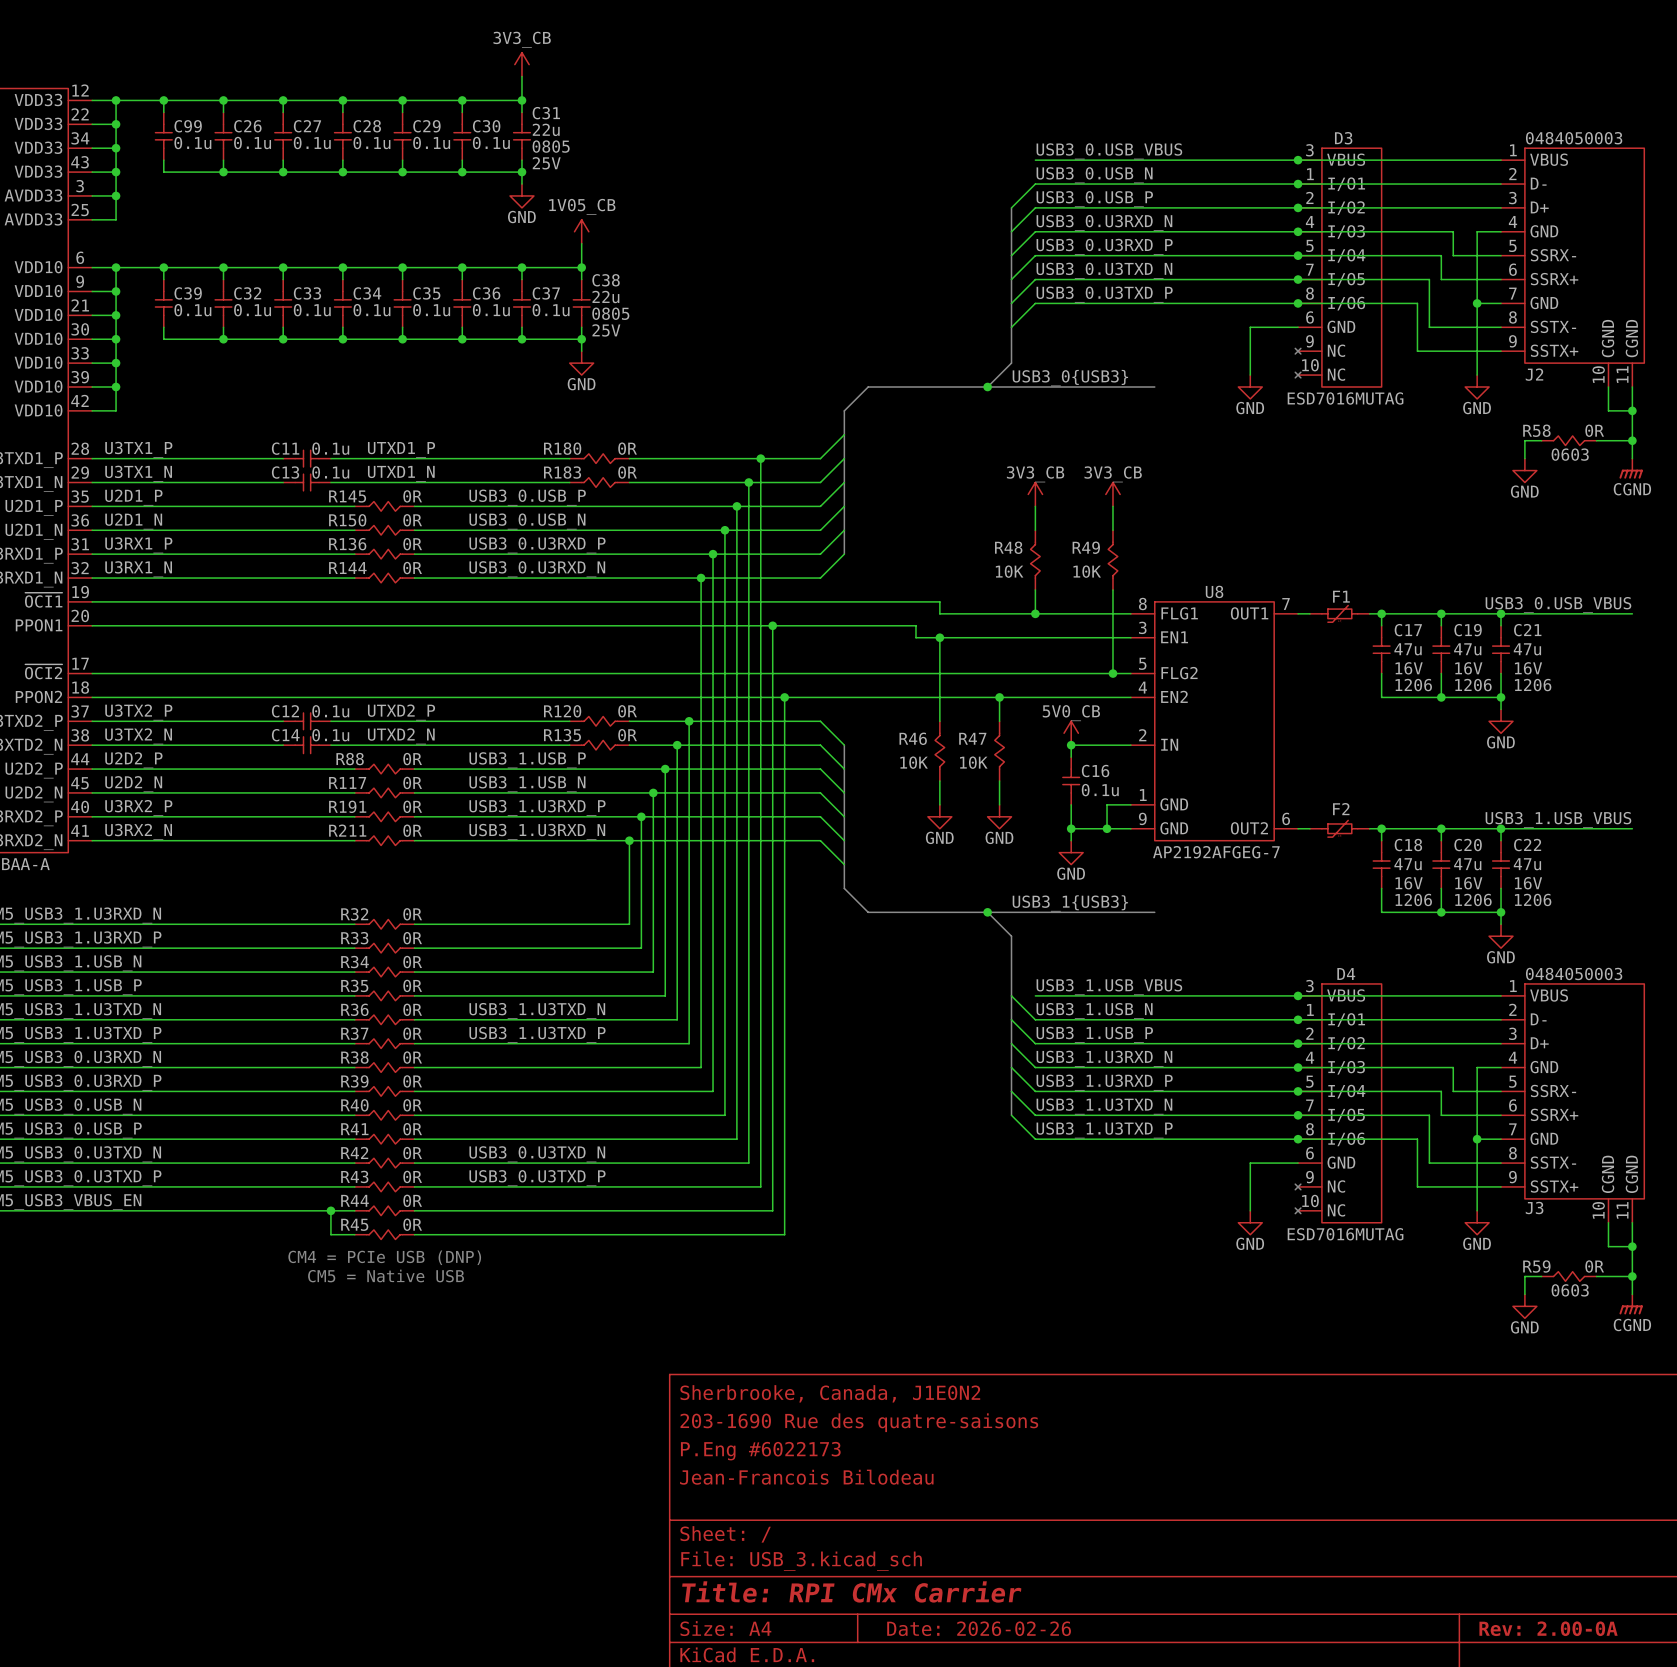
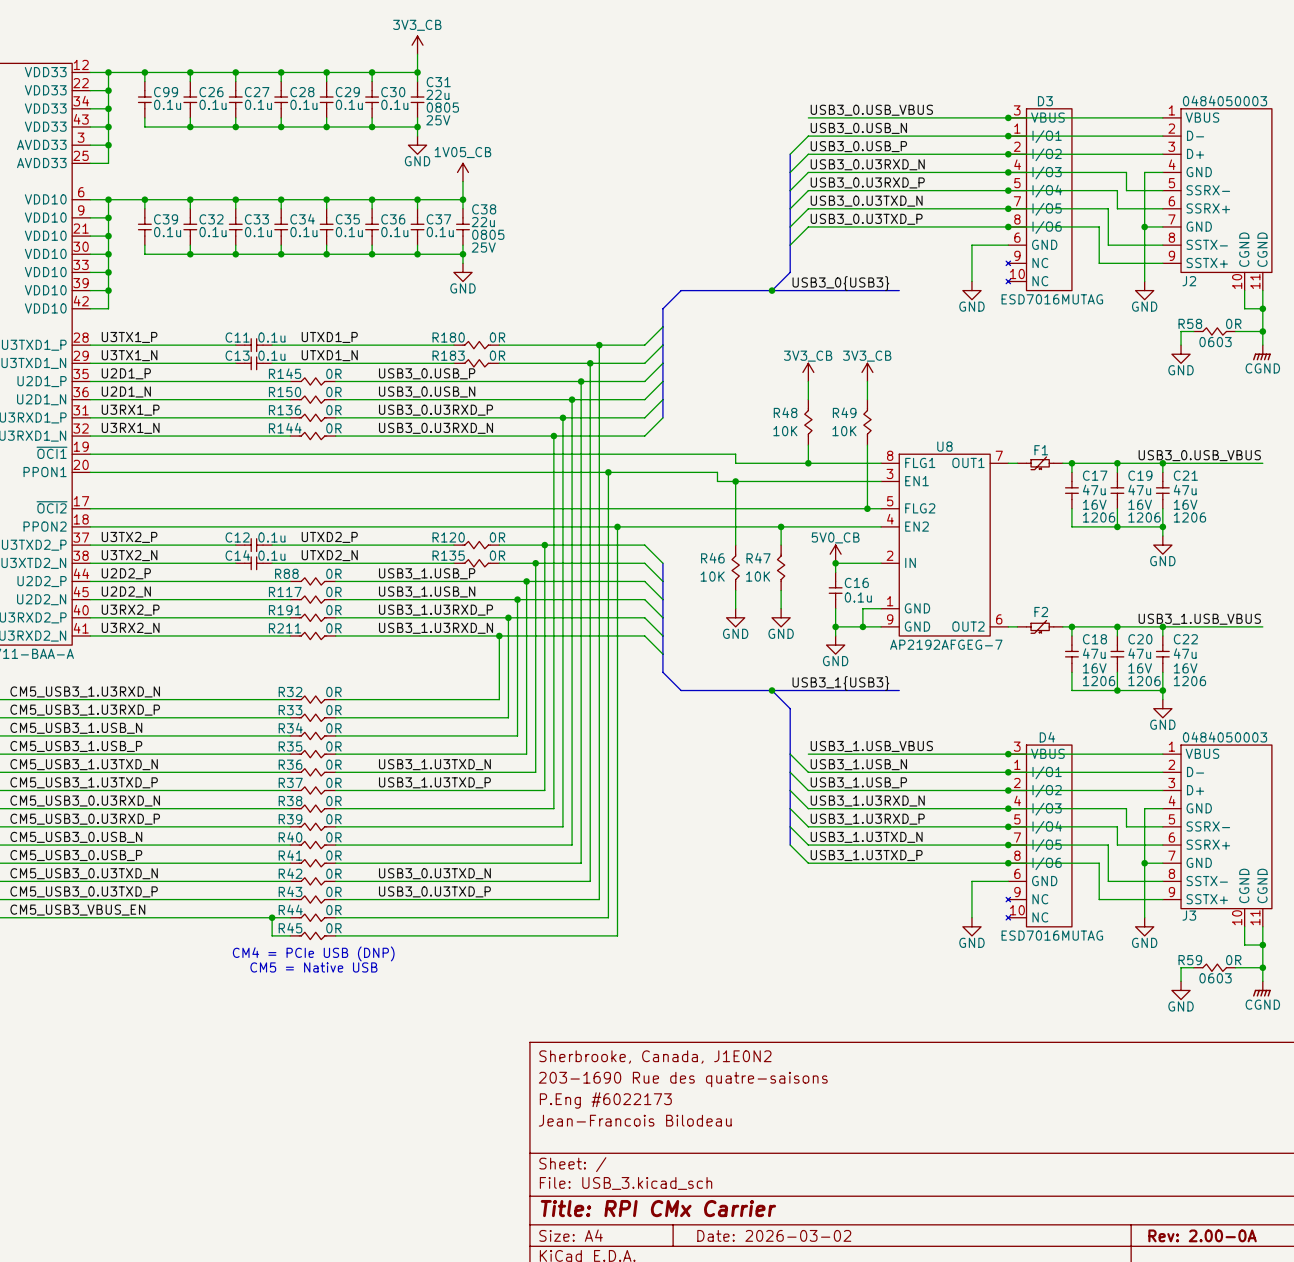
title block: Date: 2026-02-26 (979, 1628) -> Date: 2026-03-02 (774, 1235)

